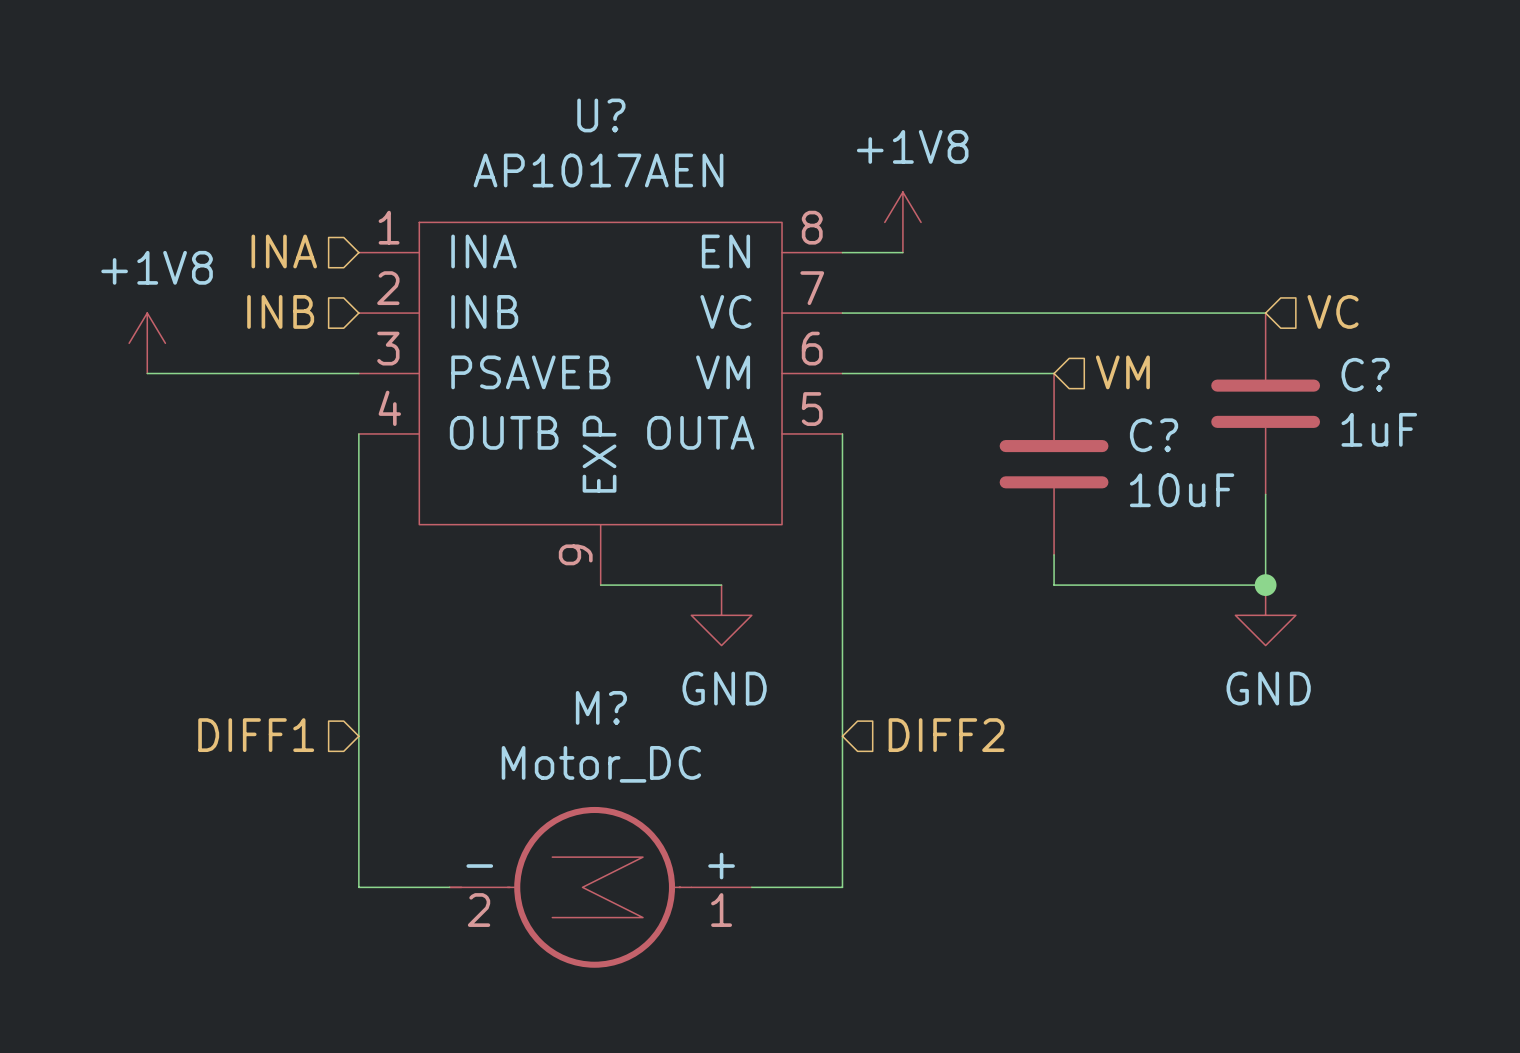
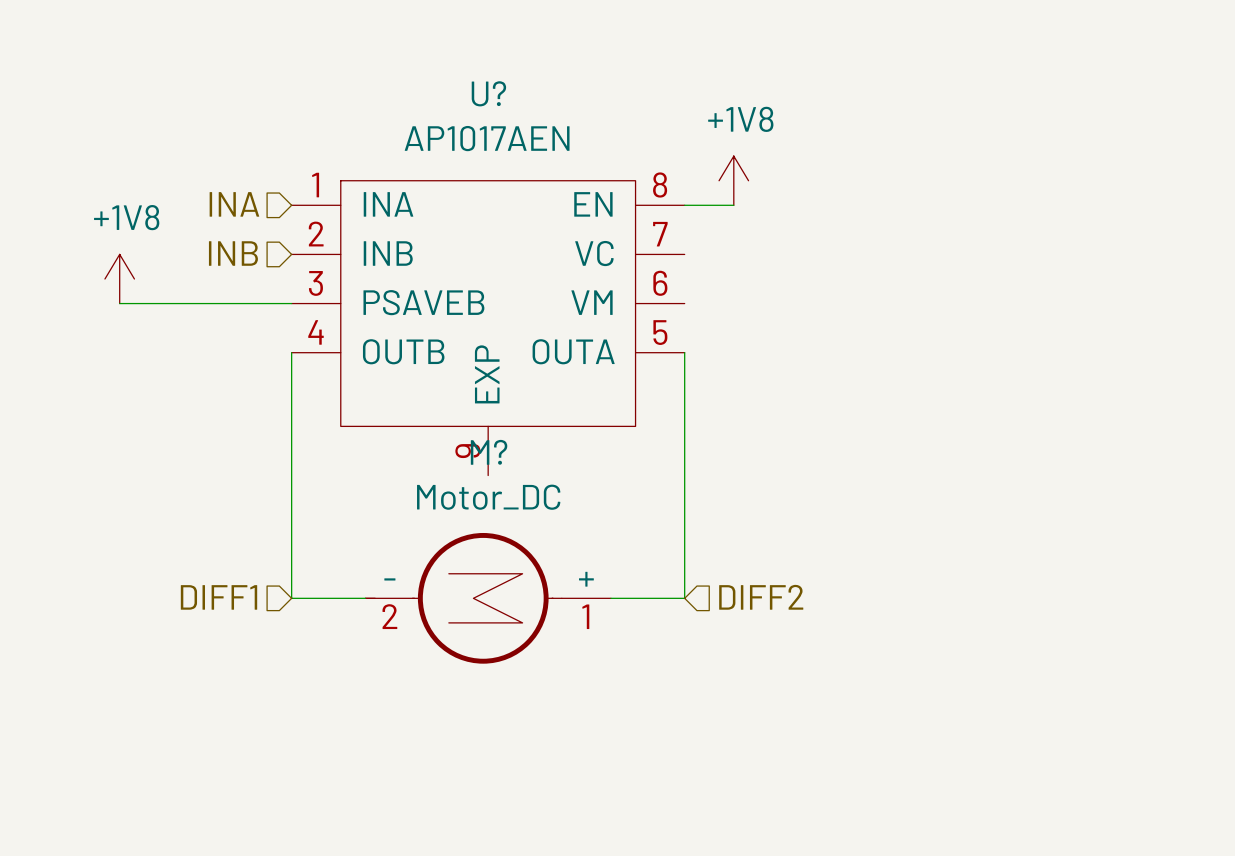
hierarchical label: VC (1333, 311) -> none
wire: (842, 313) (1265, 313) -> none
hierarchical label: VM (1122, 372) -> none
wire: (842, 373) (1054, 373) -> none
C?: 1uF (1265, 403) -> none
C?: 10uF (1054, 464) -> none
wire: (1265, 494) (1265, 585) (1054, 585) (1054, 554) -> none
wire: (600, 585) (721, 585) -> none
junction: (1265, 585) -> none
power symbol: GND (721, 615) -> none
power symbol: GND (1265, 615) -> none
wire: (358, 736) (358, 887) (449, 887) -> (291, 598) (365, 598)
wire: (842, 736) (842, 887) (751, 887) -> (684, 598) (610, 598)
M? position: (600, 887) -> (488, 598)

